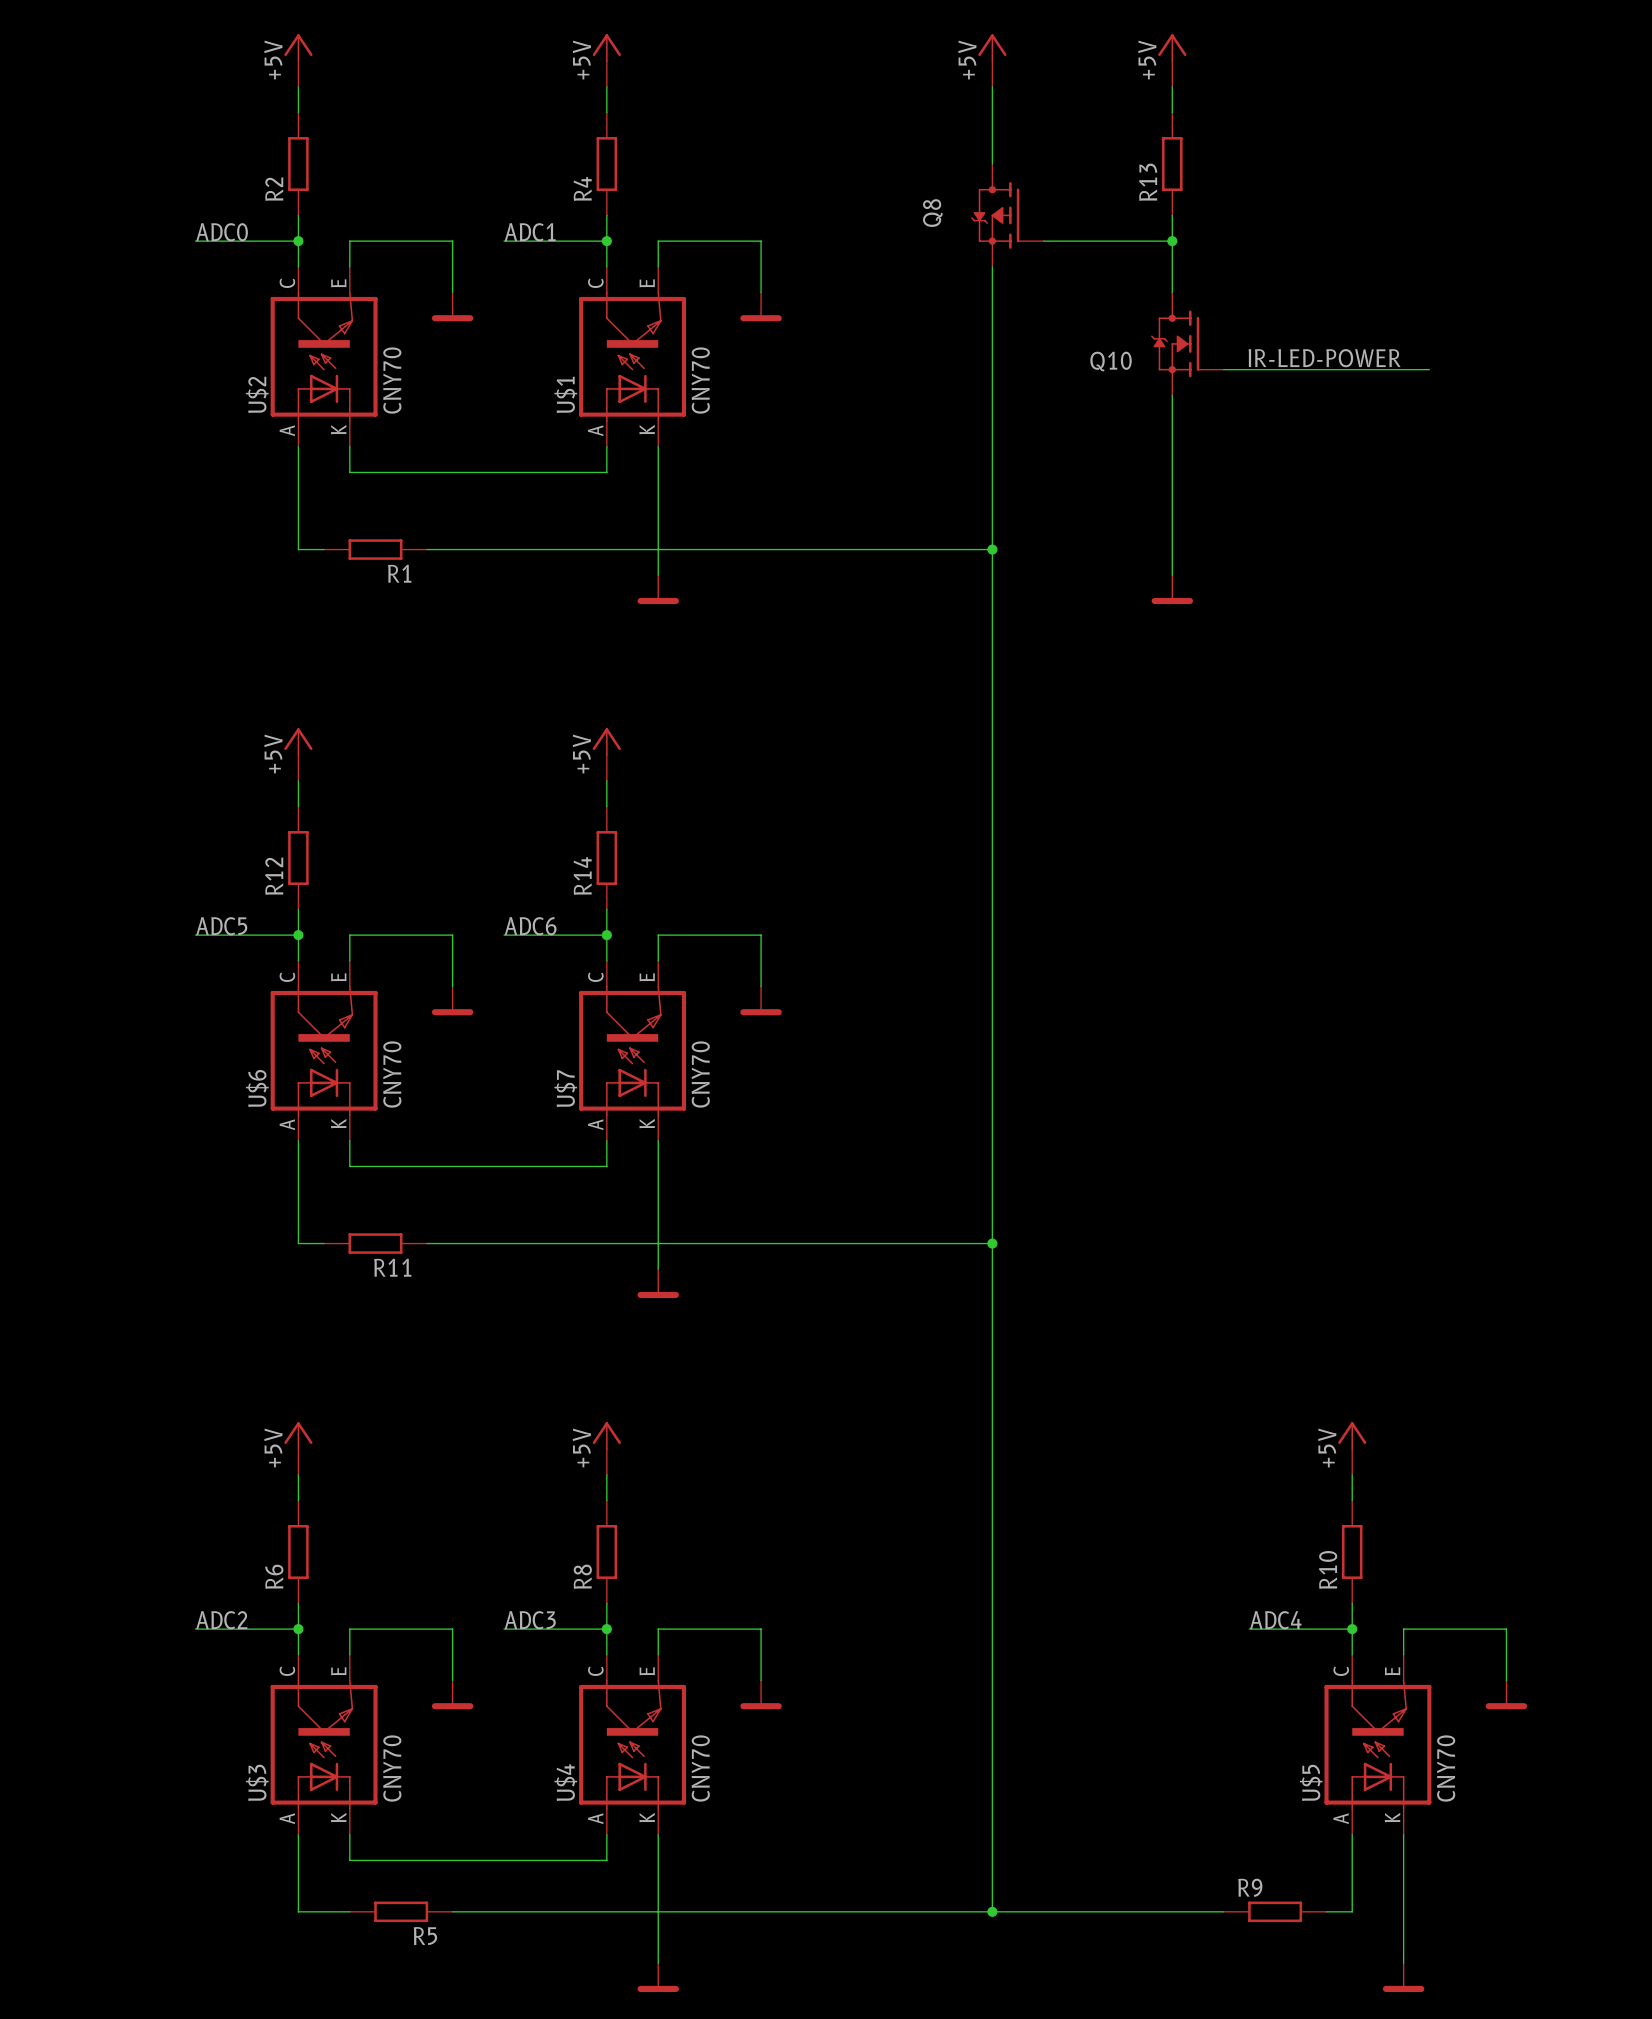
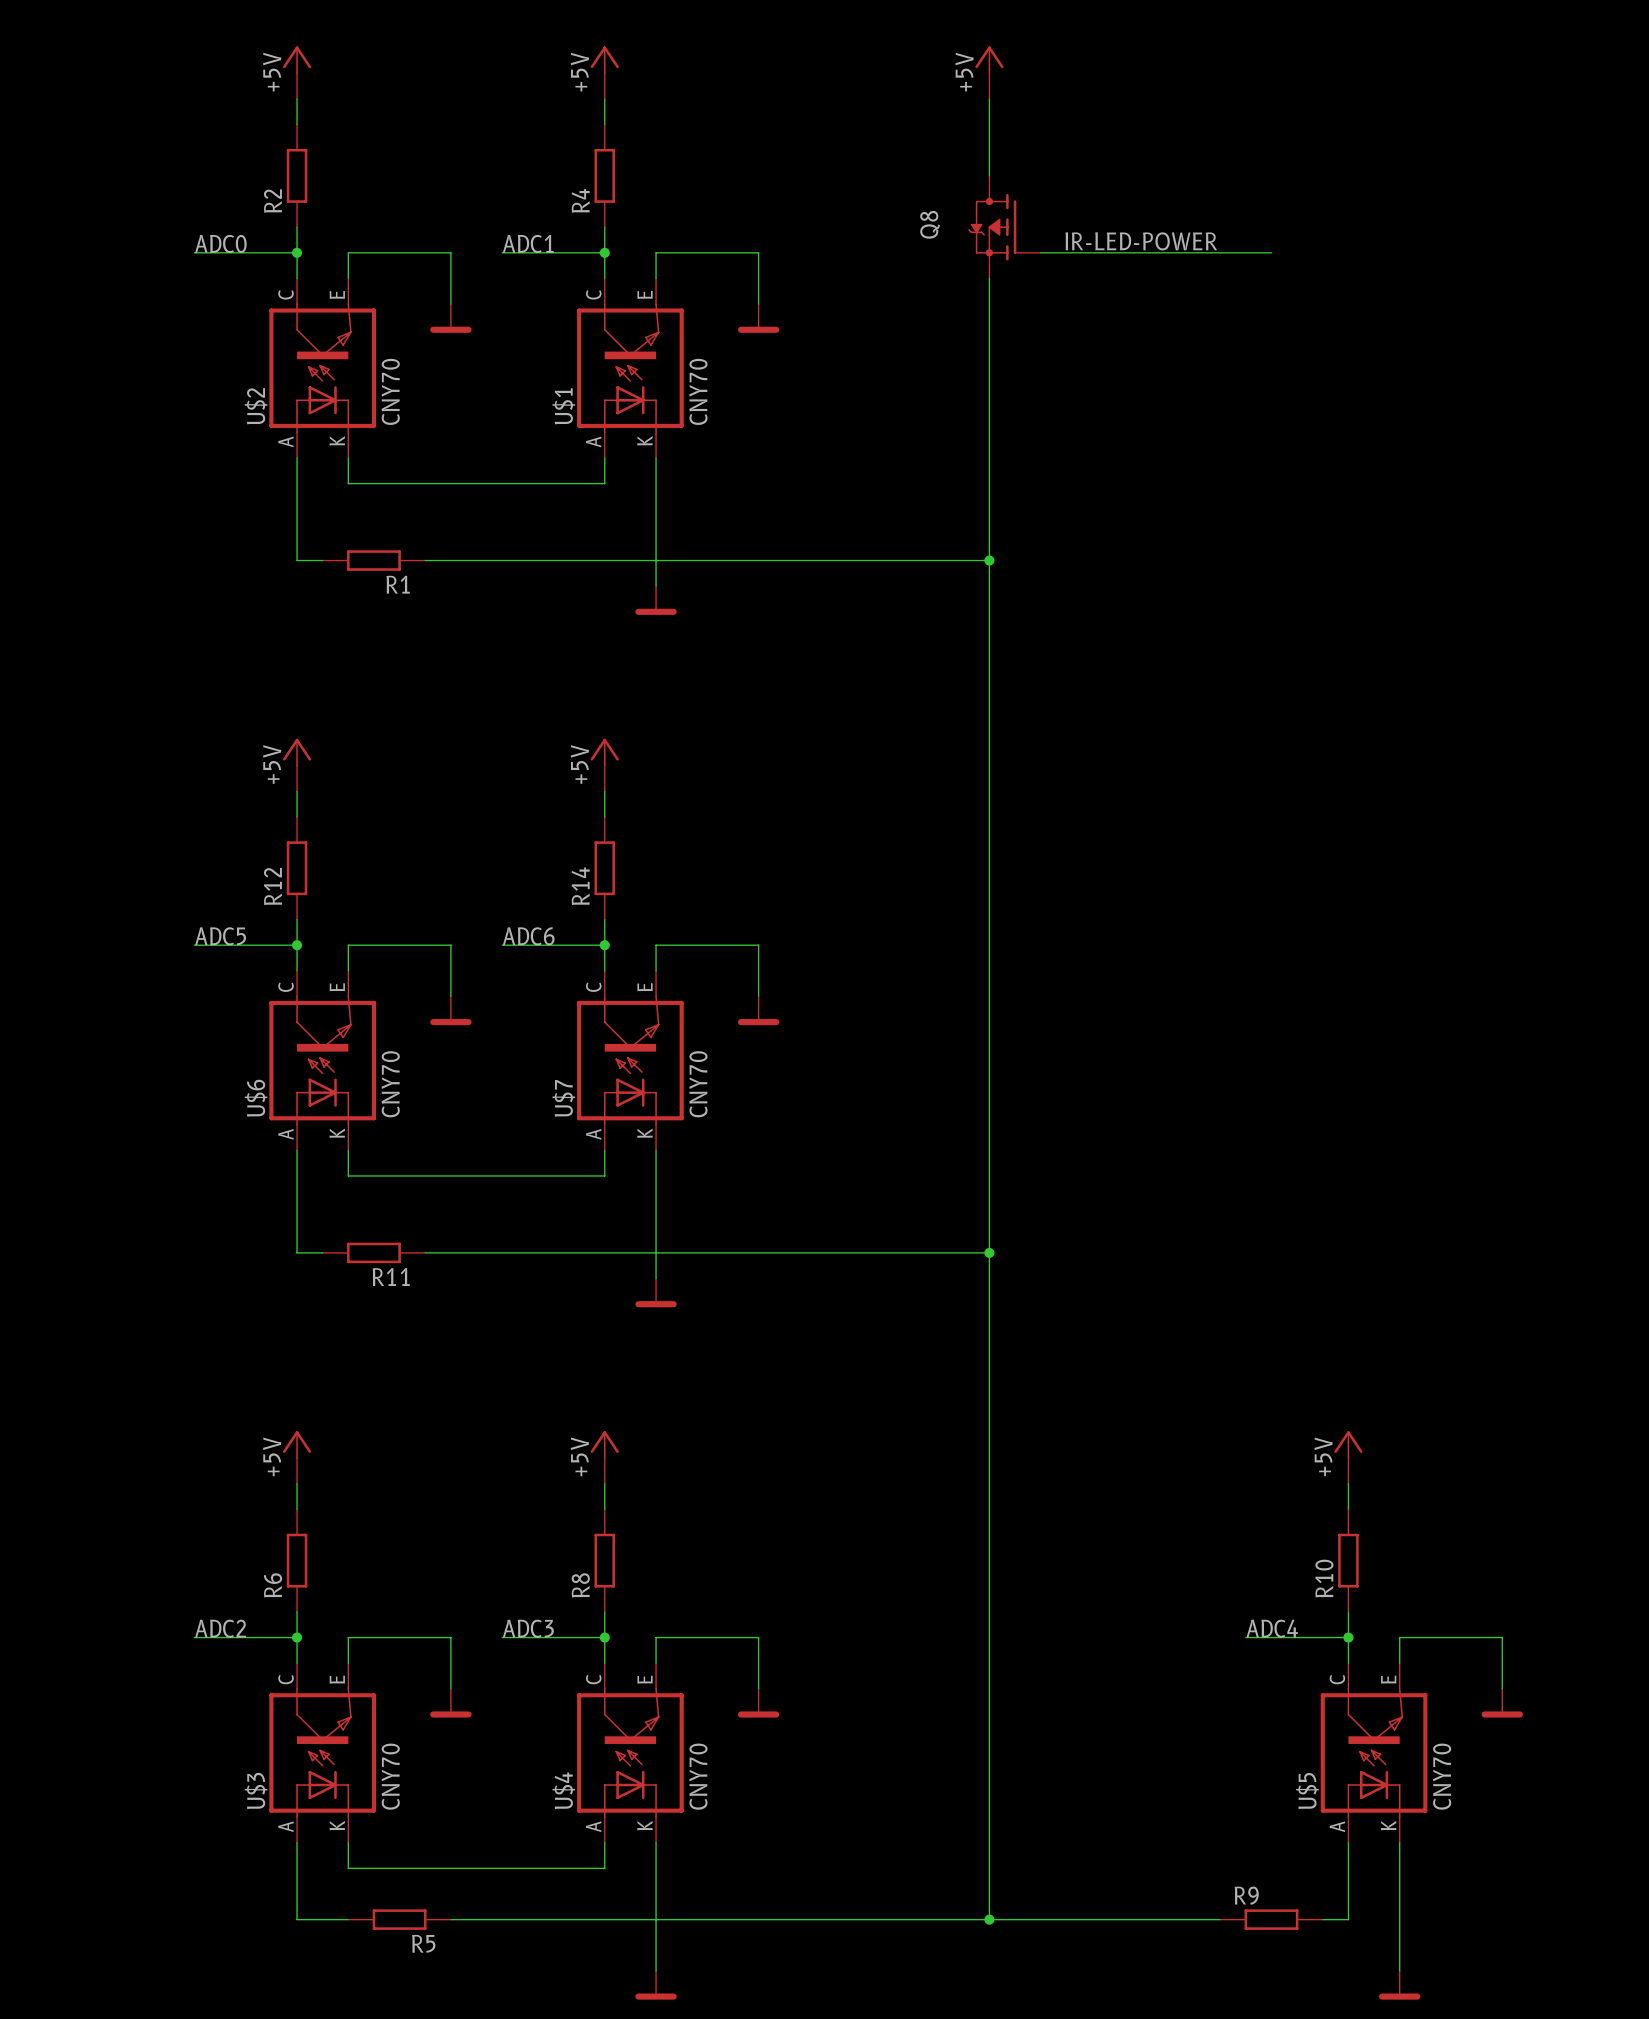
power symbol: +5V (1172, 60) -> none
wire: (1172, 86) (1172, 112) -> none
R13: (1172, 164) -> none
wire: (1172, 215) (1172, 292) -> none
wire: none -> (1168, 252) (1271, 252)
junction: (1172, 241) -> none
Q10: (1187, 343) -> none
label position: IR-LED-POWER (1324, 358) -> IR-LED-POWER (1141, 241)
wire: (1223, 369) (1429, 369) -> none
wire: (1172, 395) (1172, 575) -> none
power symbol: (1172, 589) -> none

